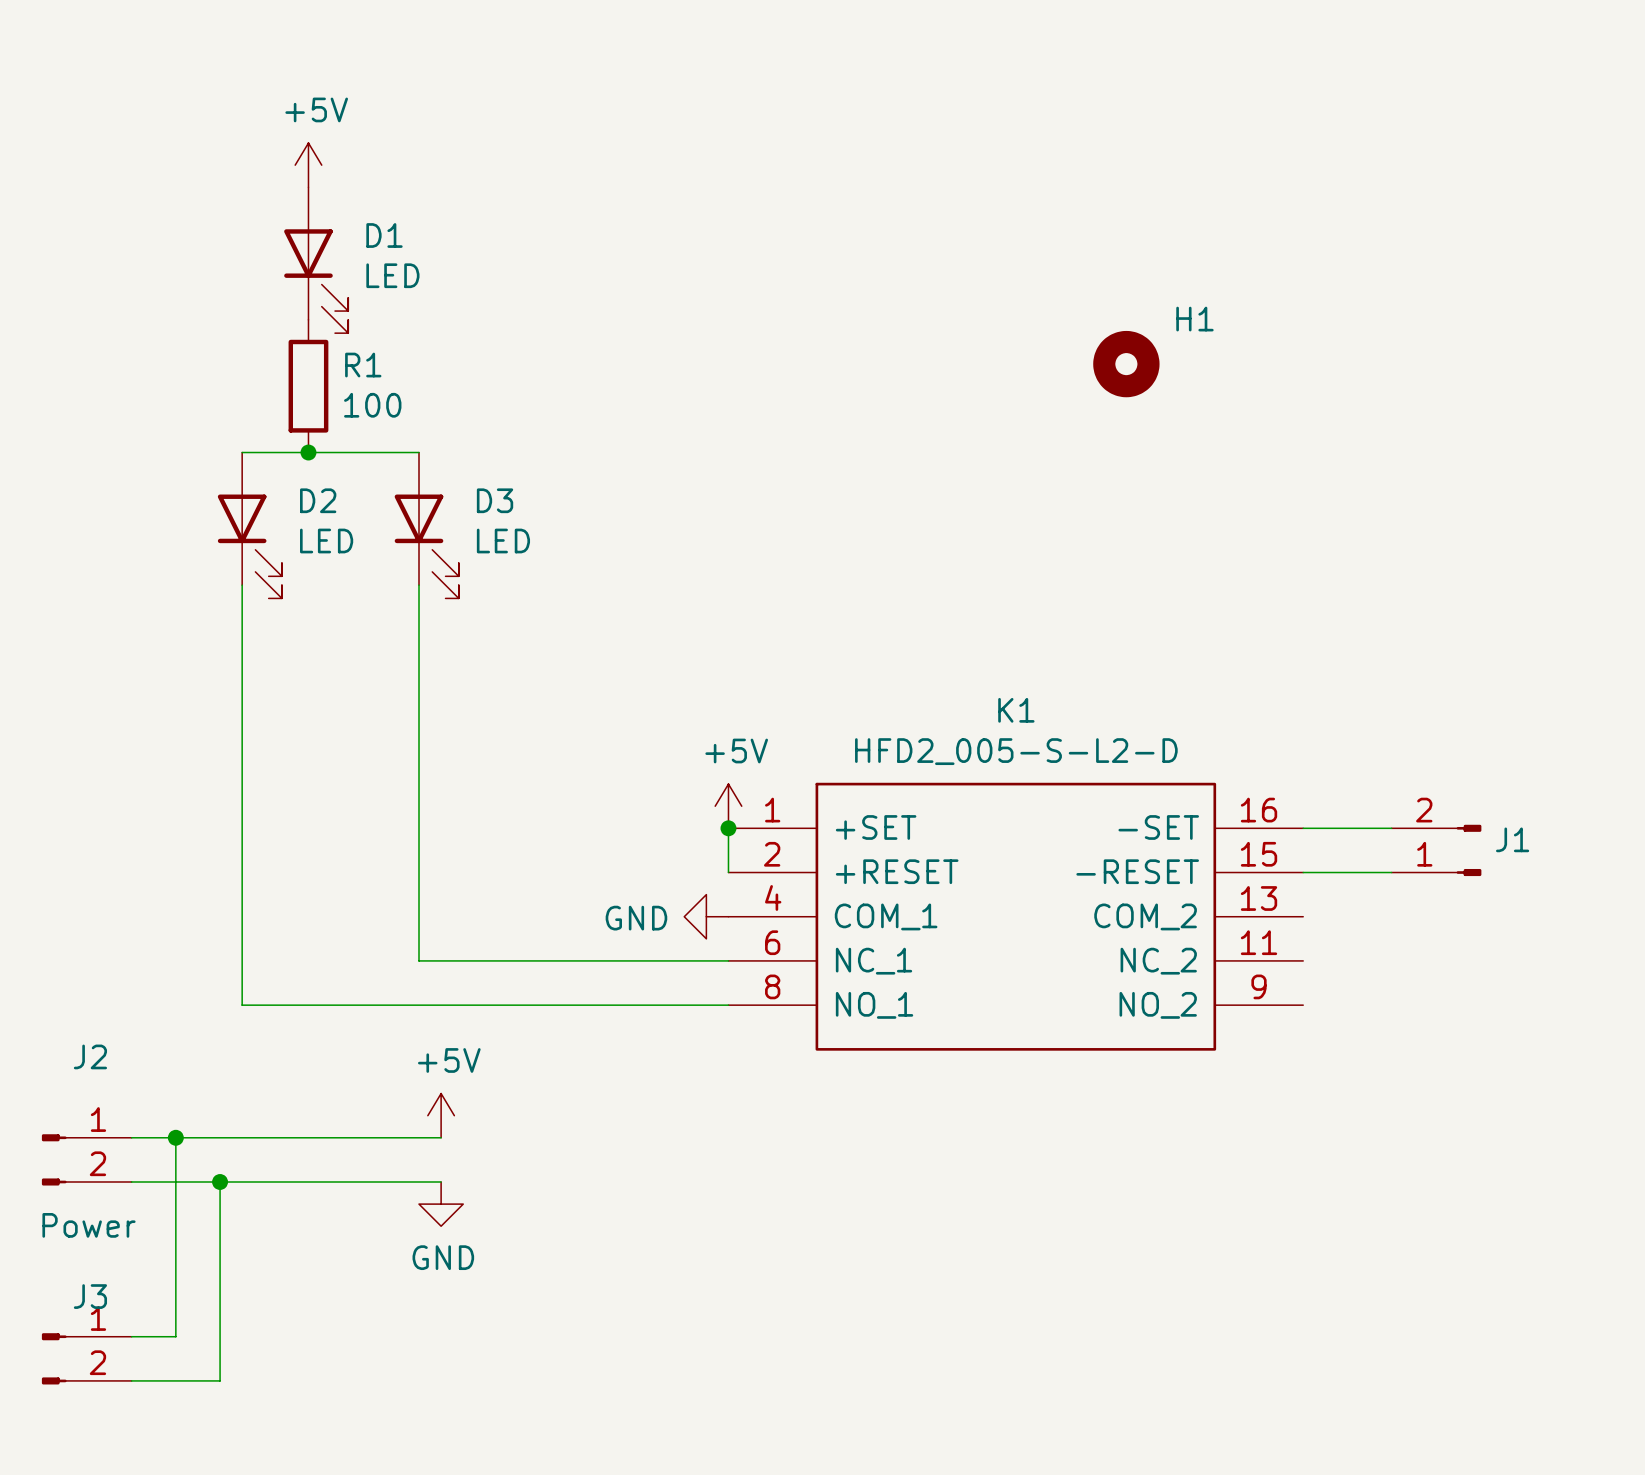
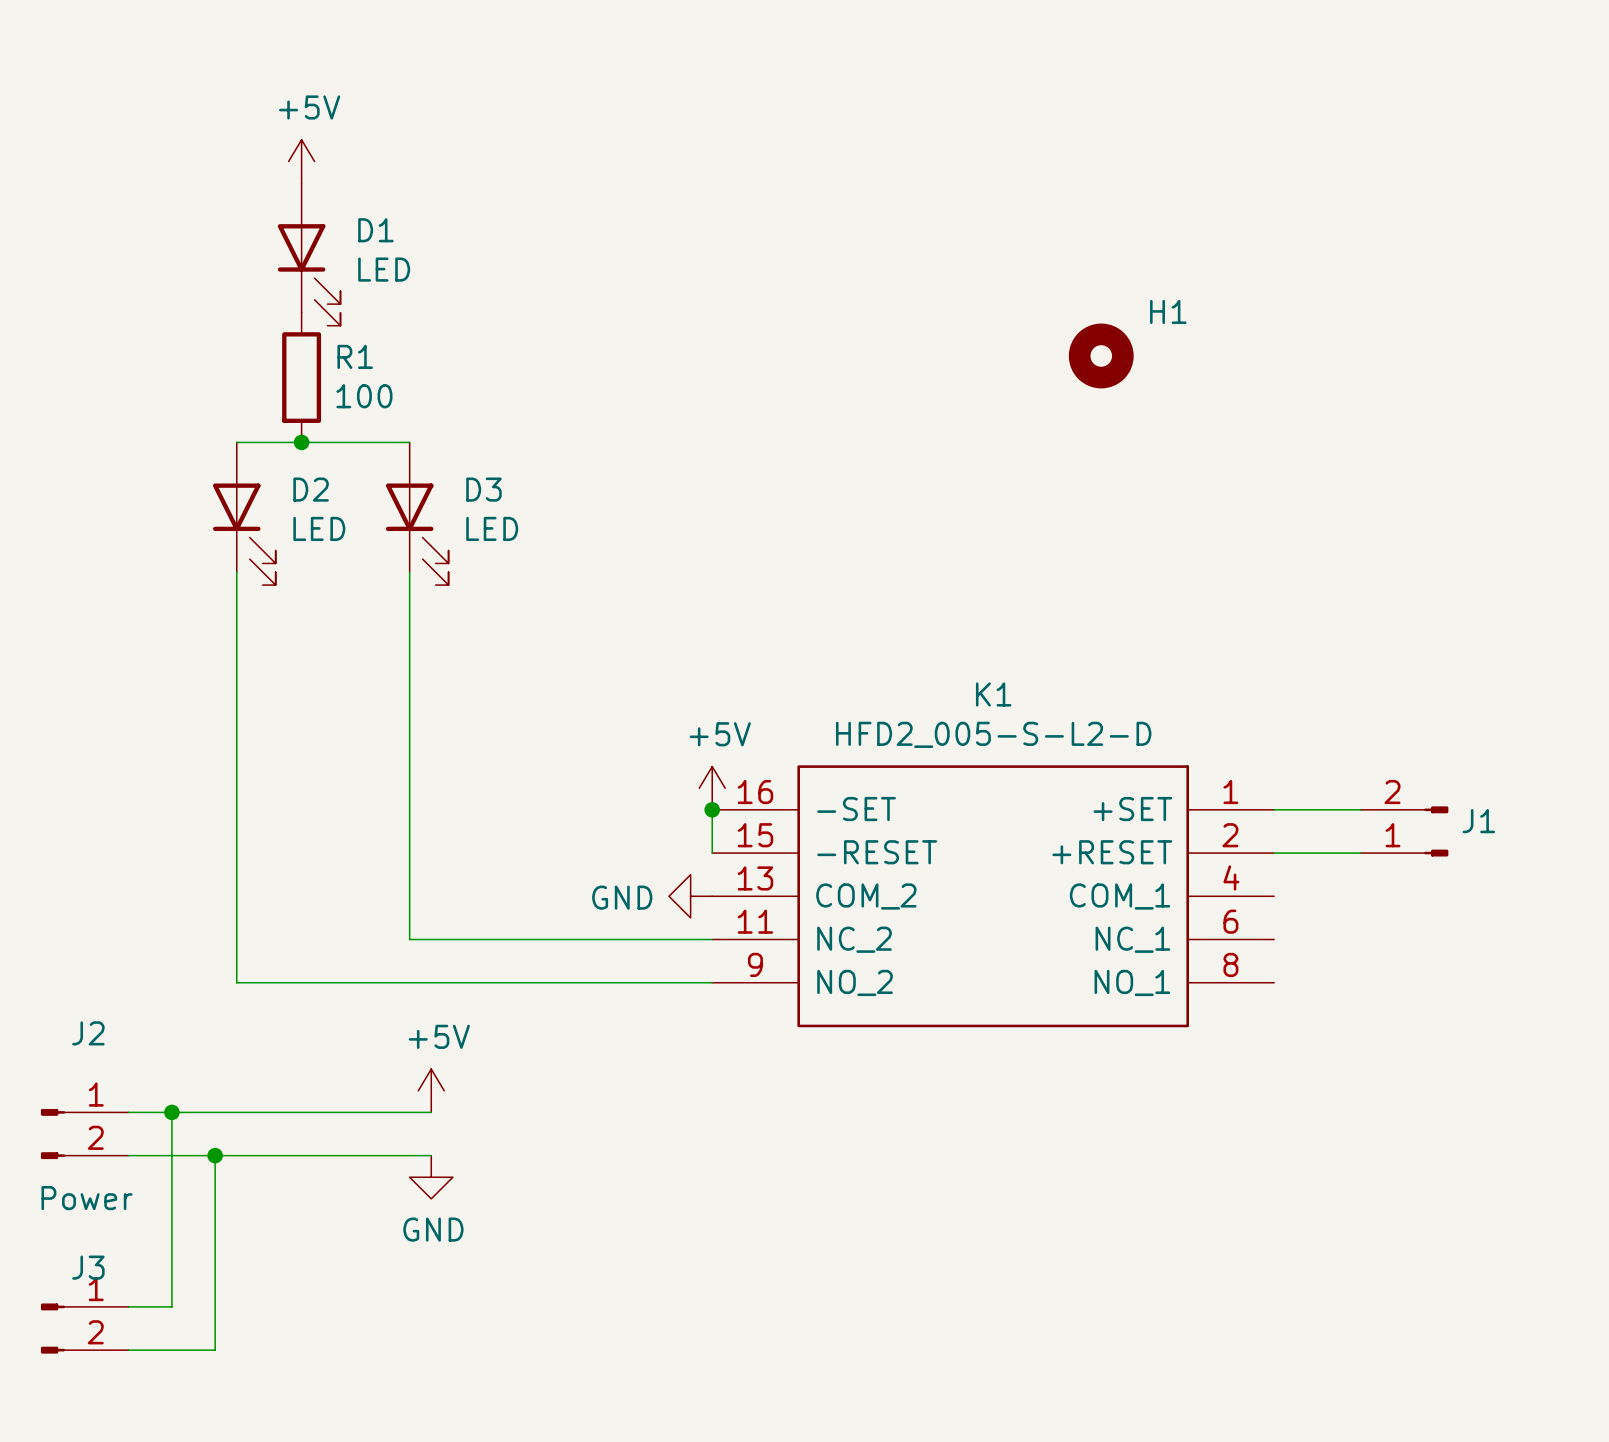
K1 flip: as is (1015, 916) -> left-right (993, 896)

